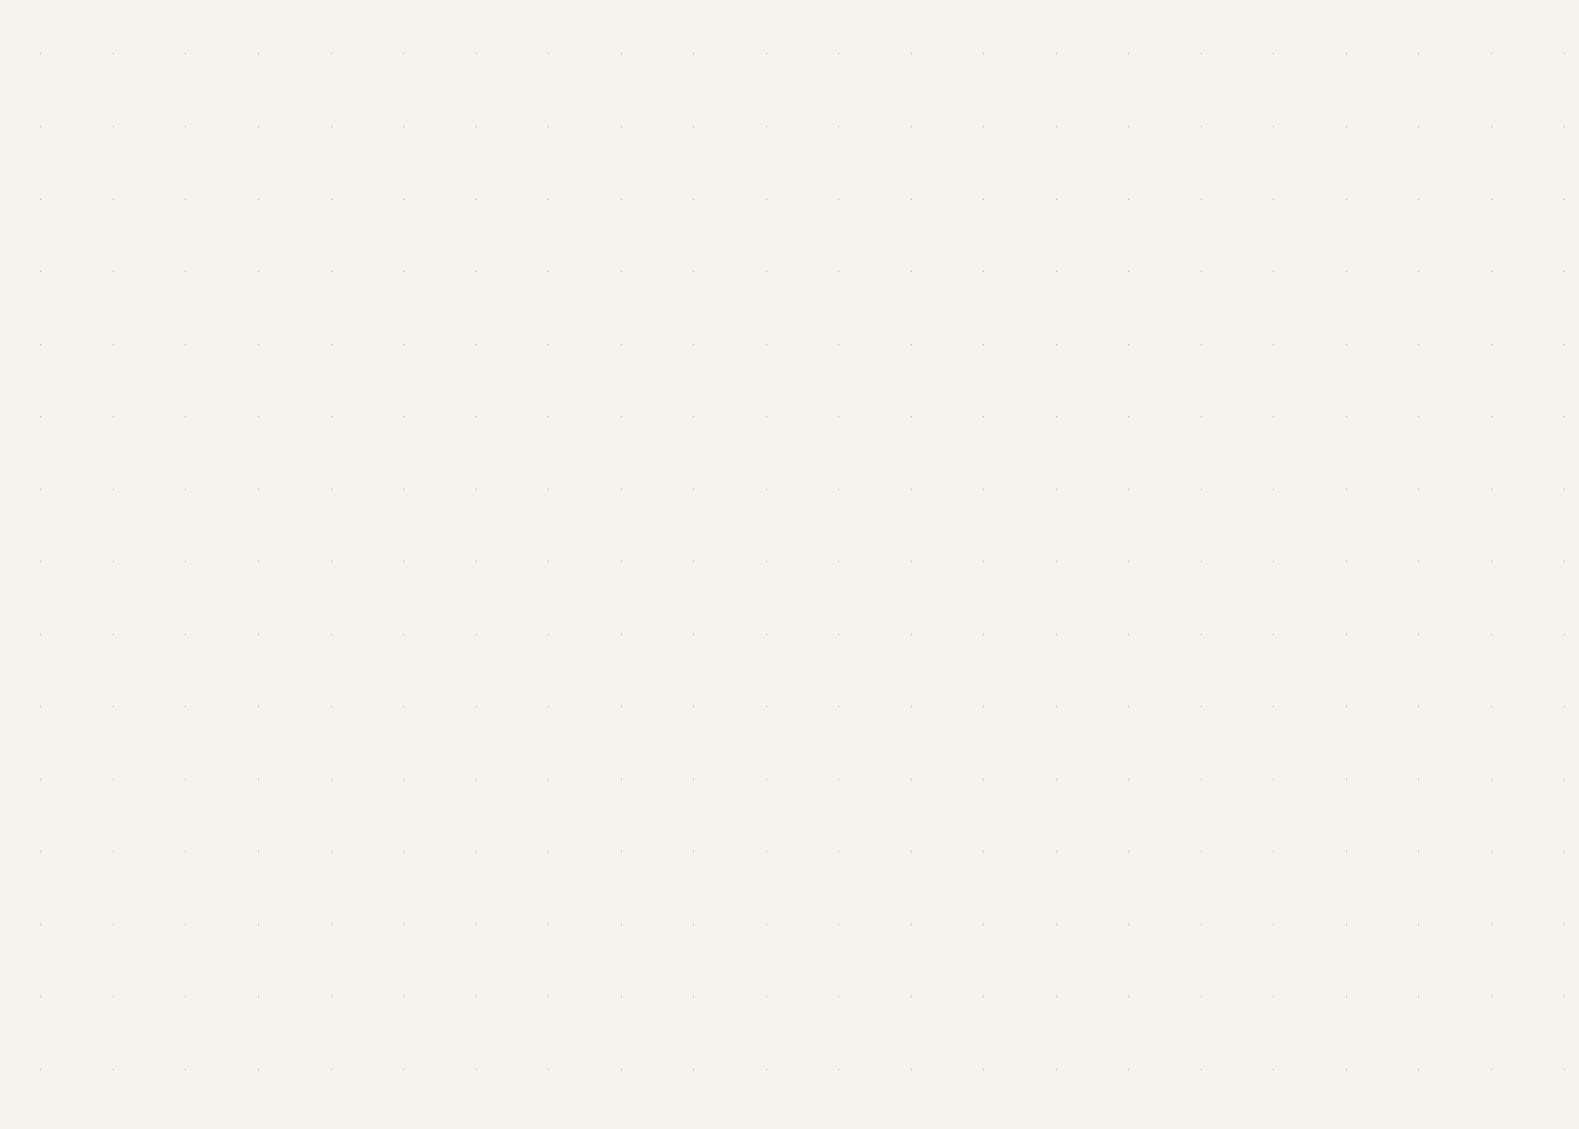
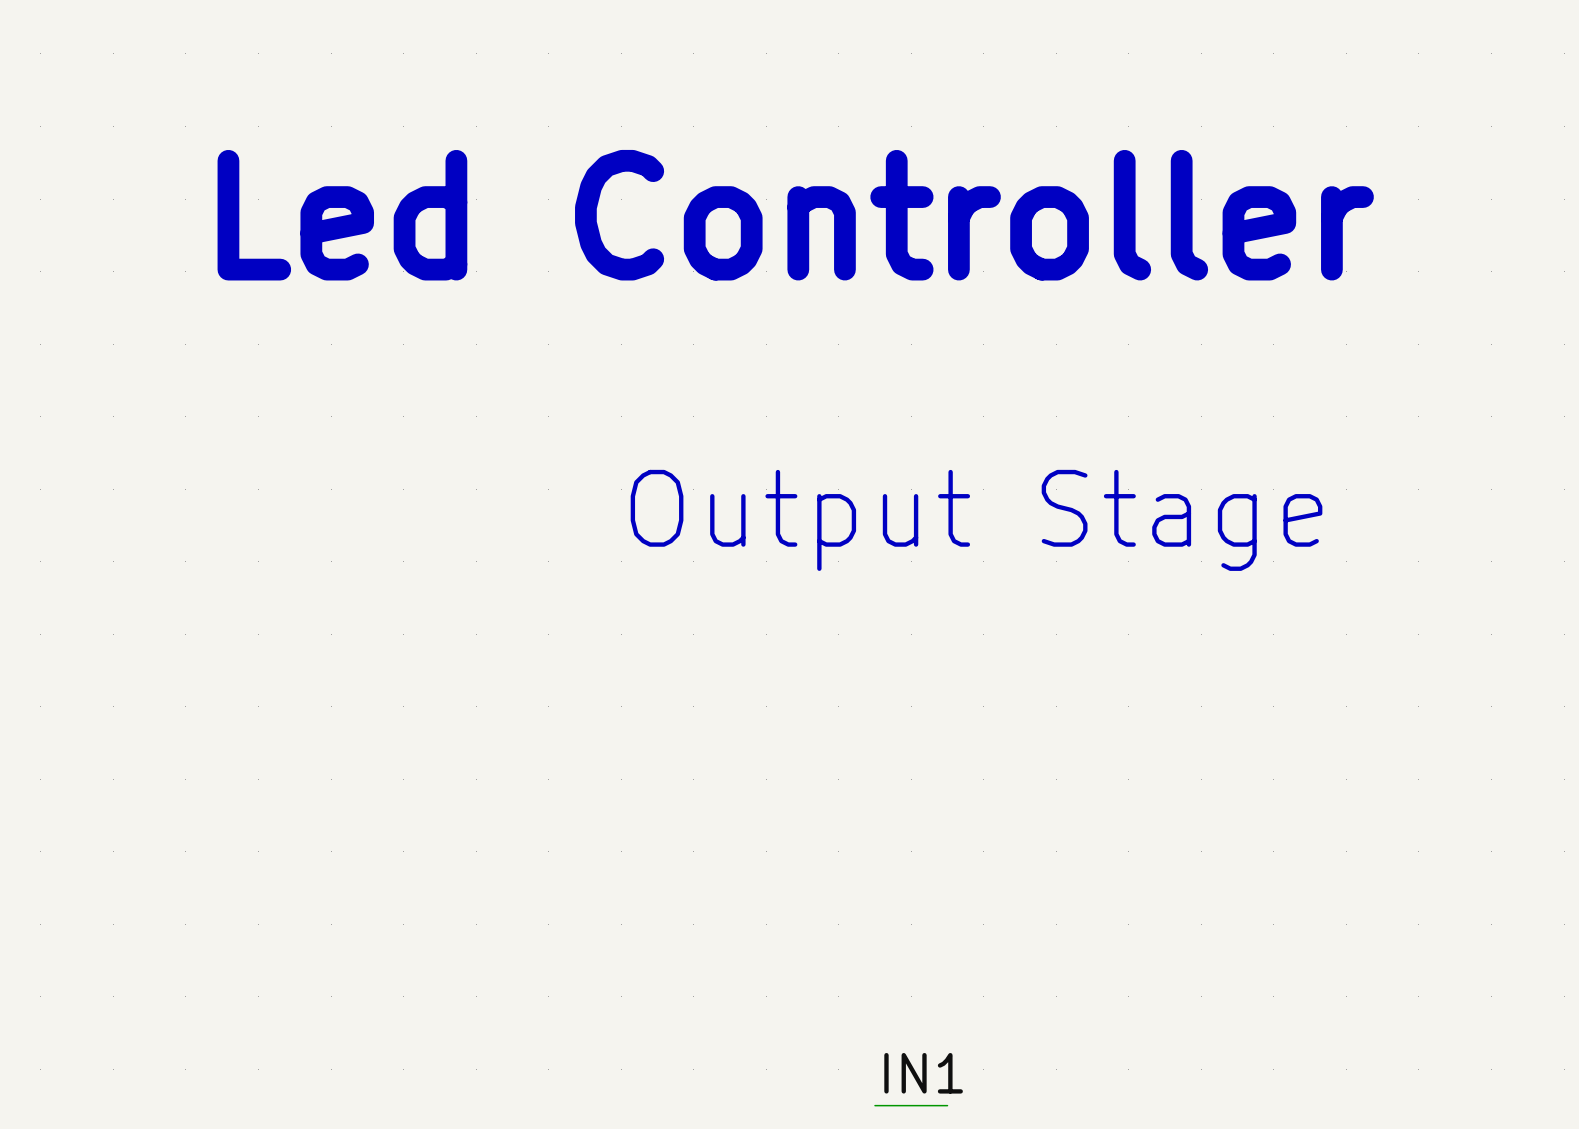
text: none -> Led Controller (795, 215)
text: none -> Output Stage (976, 520)
label: none -> IN1 (923, 1073)
wire: none -> (874, 1105) (947, 1105)

